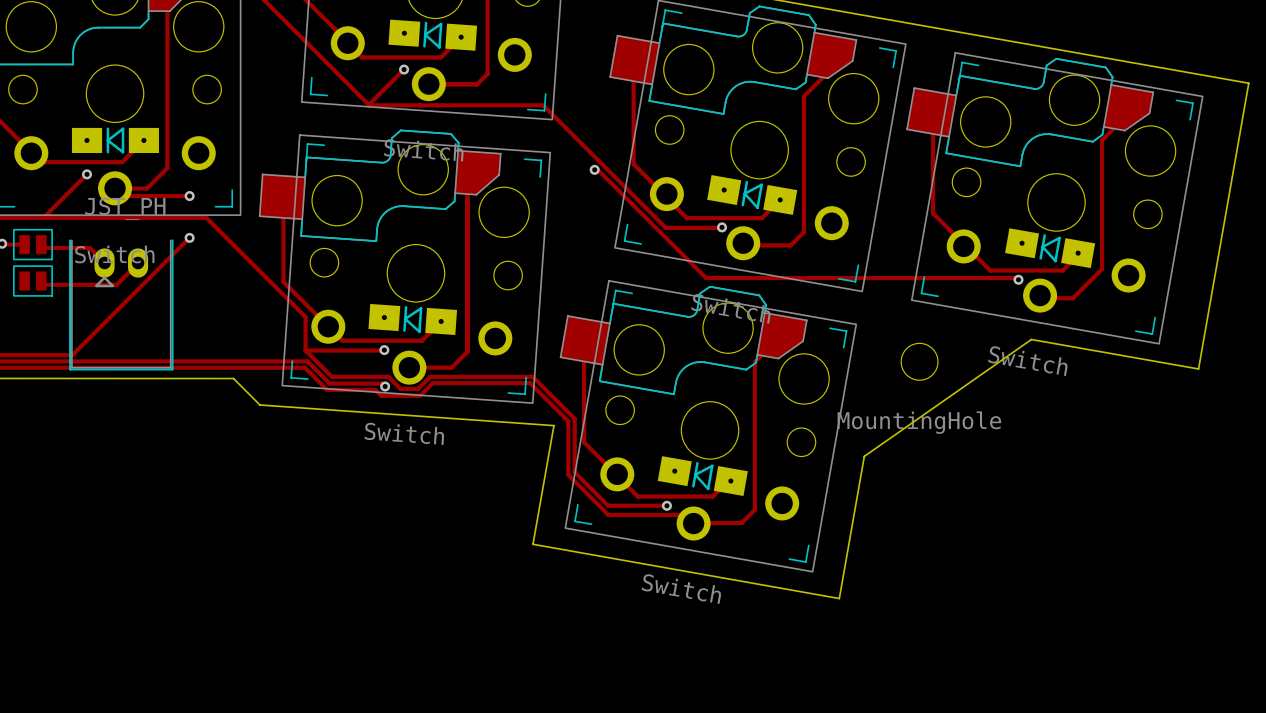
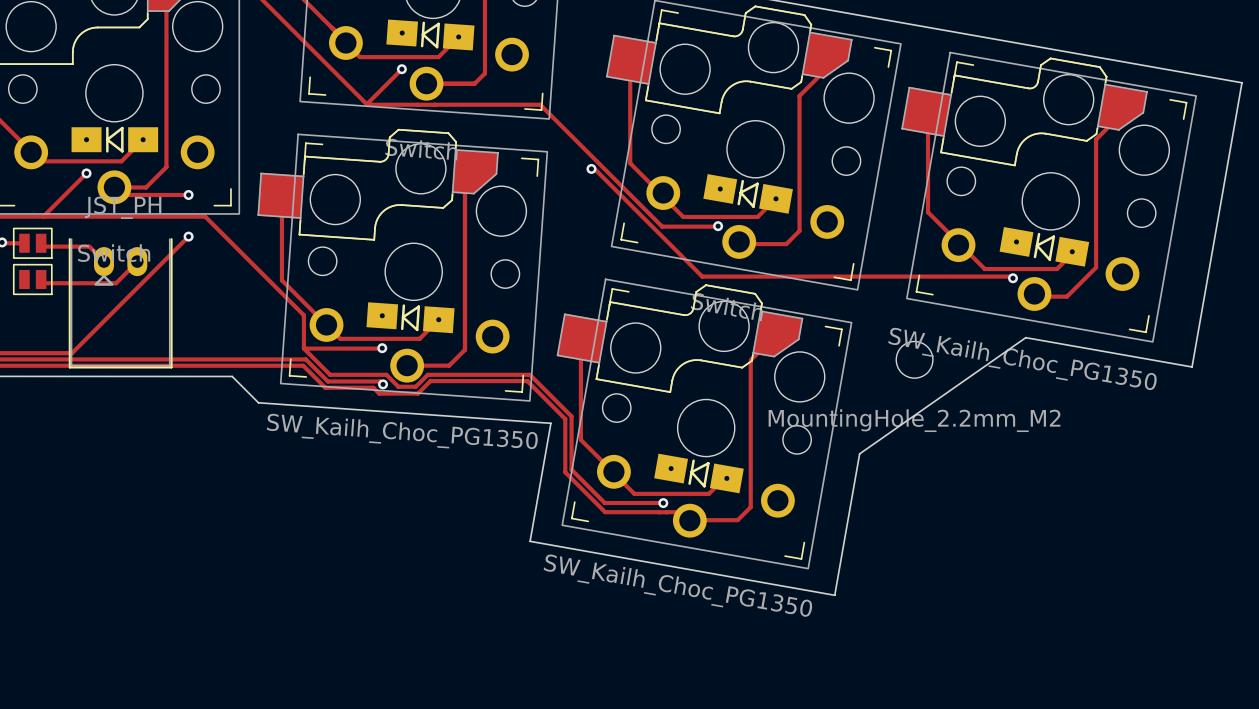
part value: Switch (1027, 361) -> SW_Kailh_Choc_PG1350 (1022, 358)
part value: MountingHole (919, 422) -> MountingHole_2.2mm_M2 (914, 420)
part value: Switch (404, 433) -> SW_Kailh_Choc_PG1350 (402, 431)
part value: Switch (681, 588) -> SW_Kailh_Choc_PG1350 (678, 585)

